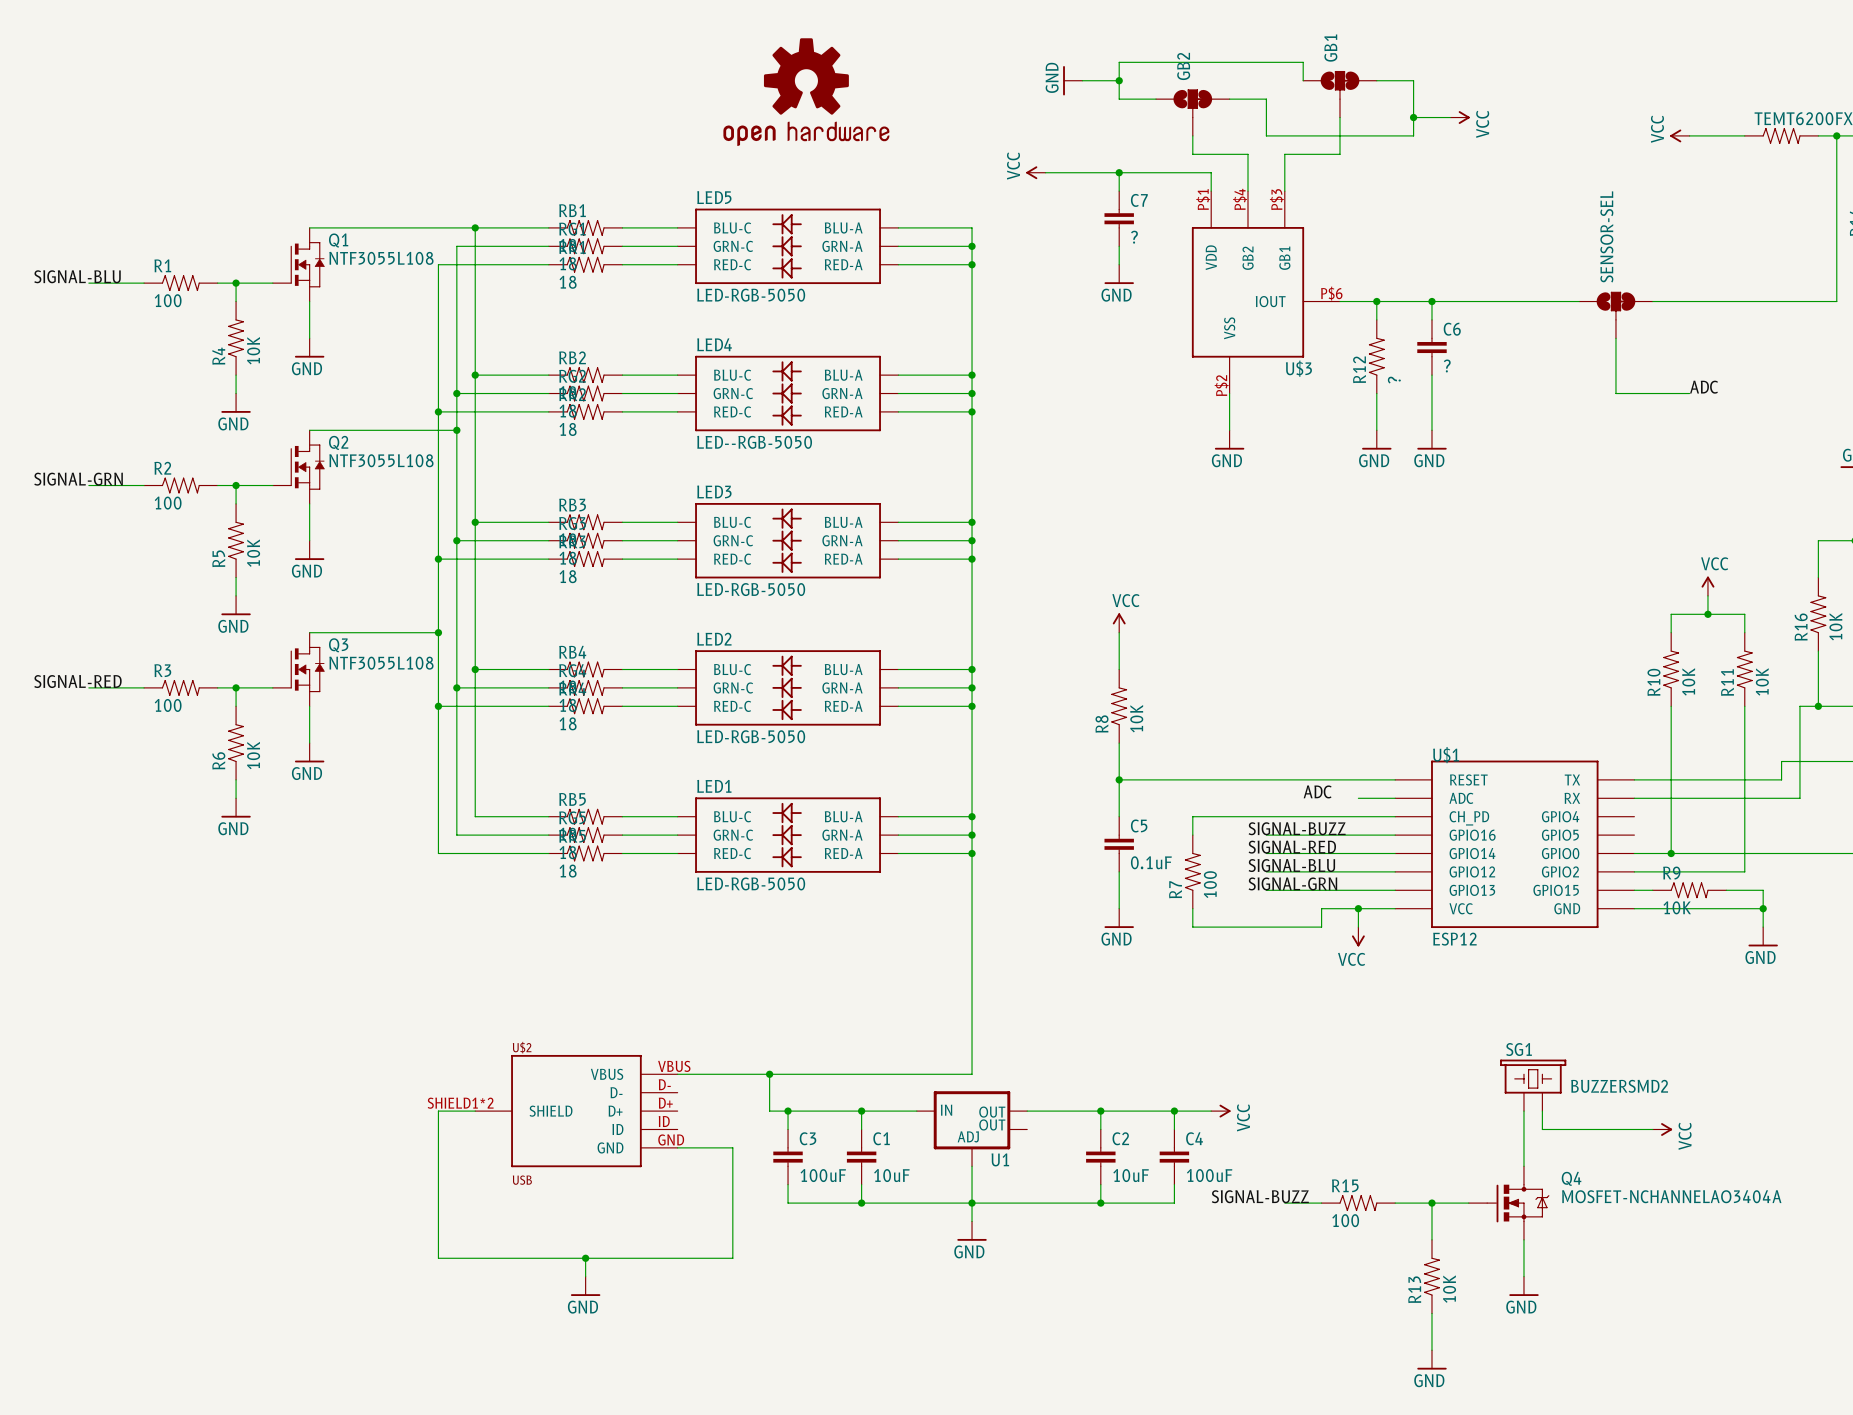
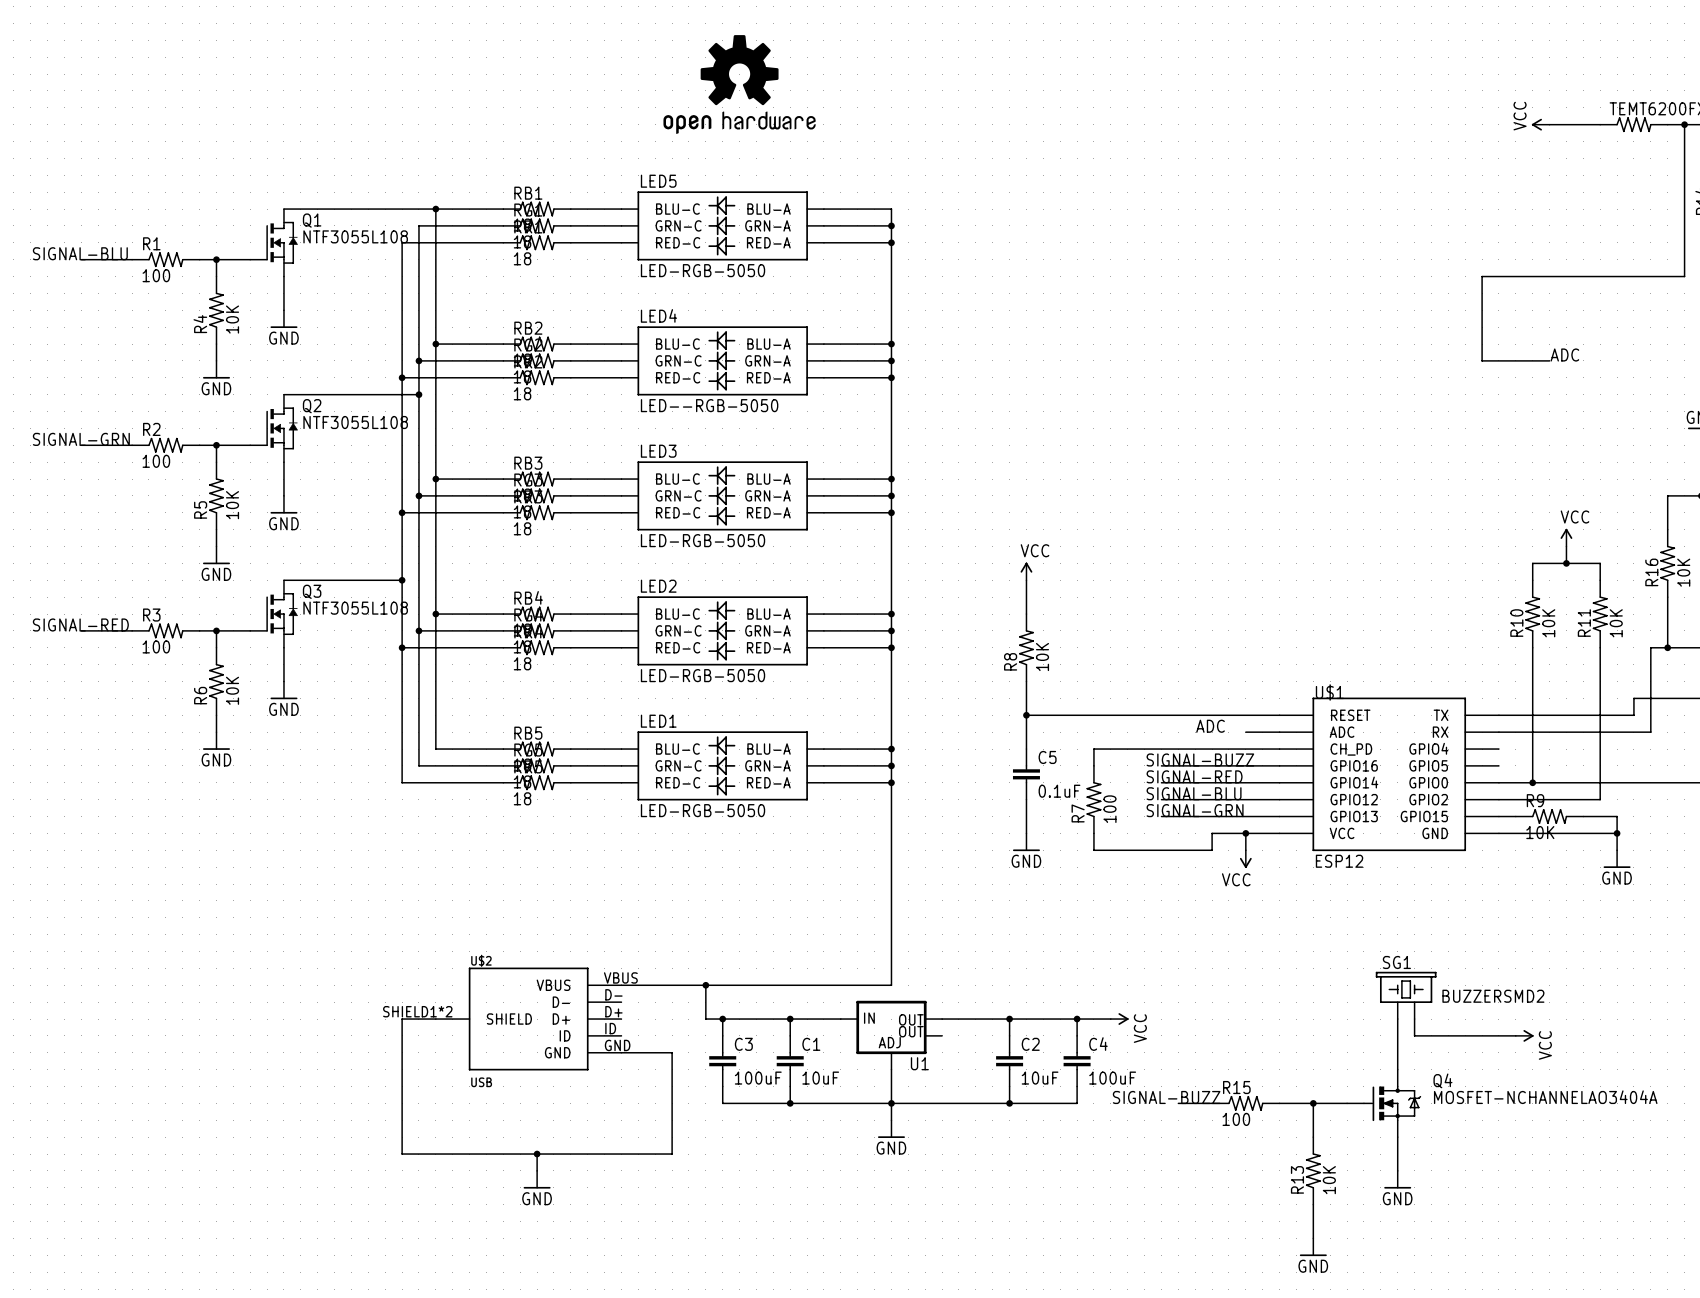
power symbol: GND (1072, 80) -> none
wire: (1082, 80) (1119, 80) -> none
junction: (1119, 80) -> none
wire: (1303, 80) (1303, 62) (1119, 62) (1119, 99) (1156, 99) -> none
wire: (1376, 80) (1413, 80) (1413, 135) (1266, 135) (1266, 99) (1229, 99) -> none
GB1: (1339, 94) -> none
GB2: (1192, 112) -> none
wire: (1339, 117) (1339, 154) (1284, 154) (1284, 191) -> none
wire: (1413, 117) (1450, 117) -> none
junction: (1413, 117) -> none
power symbol: VCC (1460, 117) -> none
wire: (1192, 135) (1192, 154) (1248, 154) (1248, 191) -> none
power symbol: VCC (1035, 172) -> none
wire: (1045, 172) (1211, 172) (1211, 191) -> none
wire: (1119, 172) (1119, 191) -> none
junction: (1119, 172) -> none
C7: ? (1119, 218) -> none
wire: (1119, 246) (1119, 264) -> none
power symbol: GND (1119, 274) -> none
U$3: (1265, 292) -> none
wire: (1339, 301) (1579, 301) -> none
wire: (1376, 301) (1376, 319) -> none
junction: (1376, 301) -> none
wire: (1431, 301) (1431, 319) -> none
junction: (1431, 301) -> none
SENSOR-SEL: (1615, 315) -> none
C6: ? (1431, 347) -> none
R12: ? (1376, 356) -> none
wire: (1431, 375) (1431, 430) -> none
wire: (1229, 393) (1229, 430) -> none
wire: (1376, 393) (1376, 430) -> none
power symbol: GND (1229, 439) -> none
power symbol: GND (1376, 439) -> none
power symbol: GND (1431, 439) -> none

